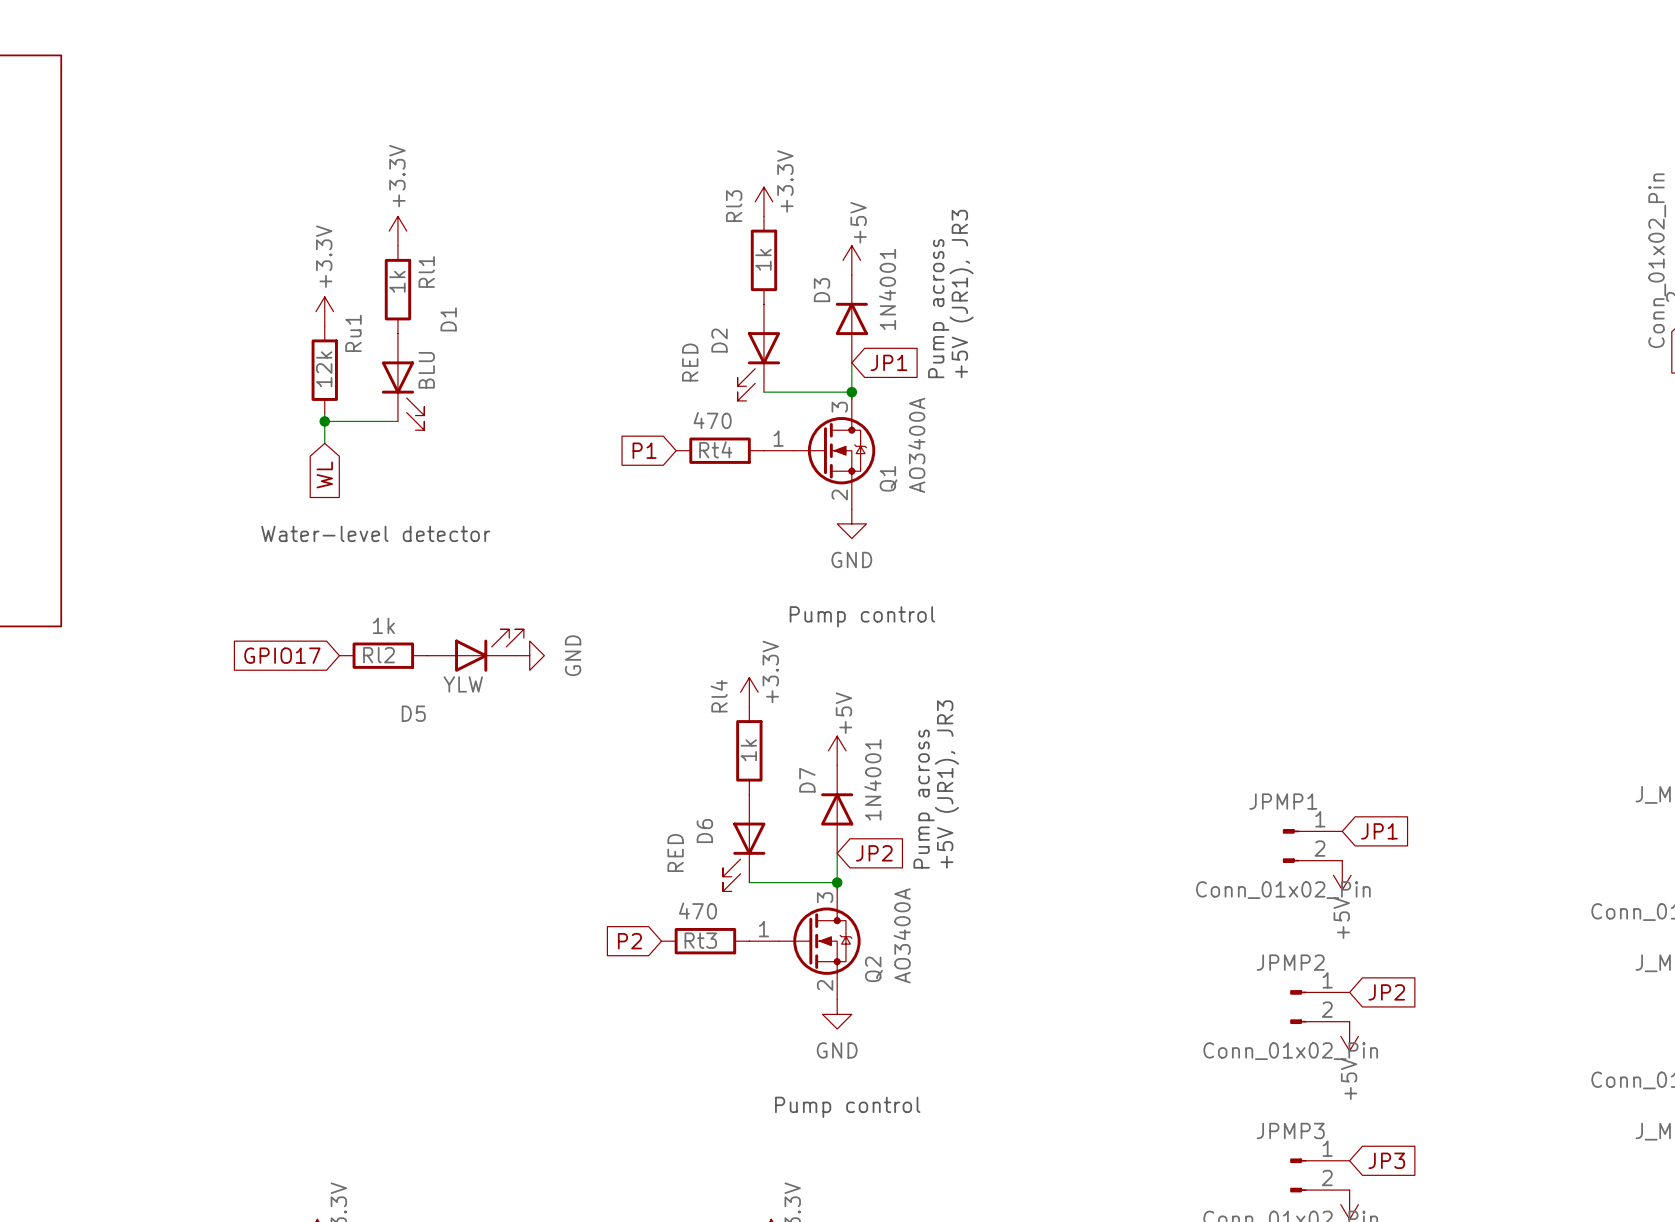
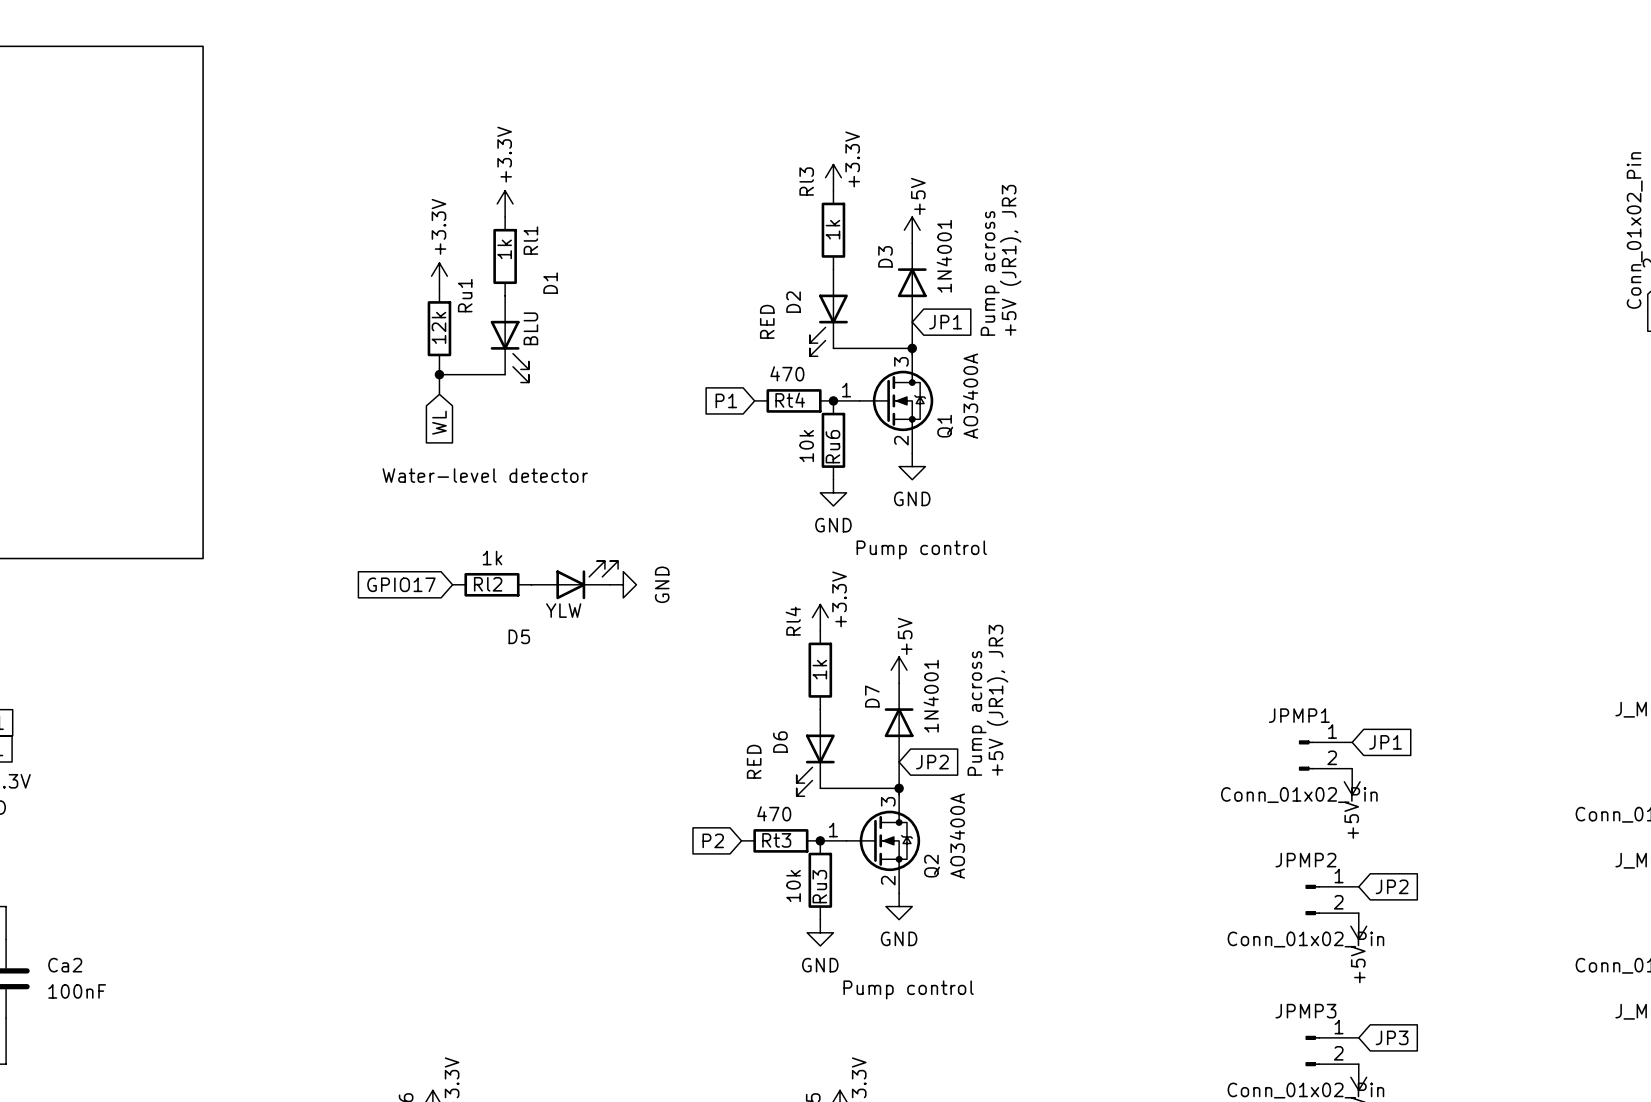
junction: none -> (833, 400)
Ru6: none -> 10k (833, 440)
power symbol: none -> GND (833, 492)
junction: none -> (820, 840)
Ru3: none -> 10k (820, 880)
power symbol: none -> GND (820, 932)

